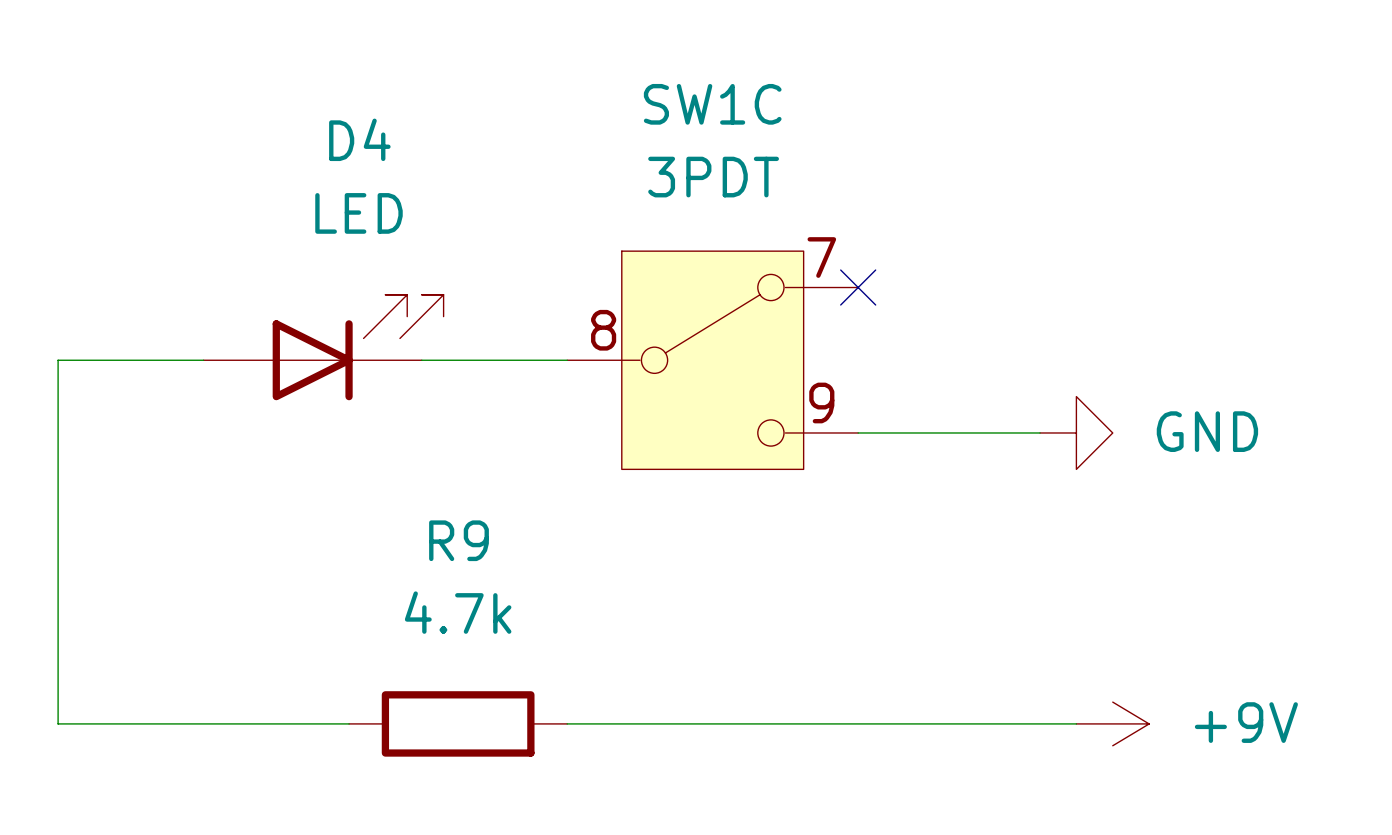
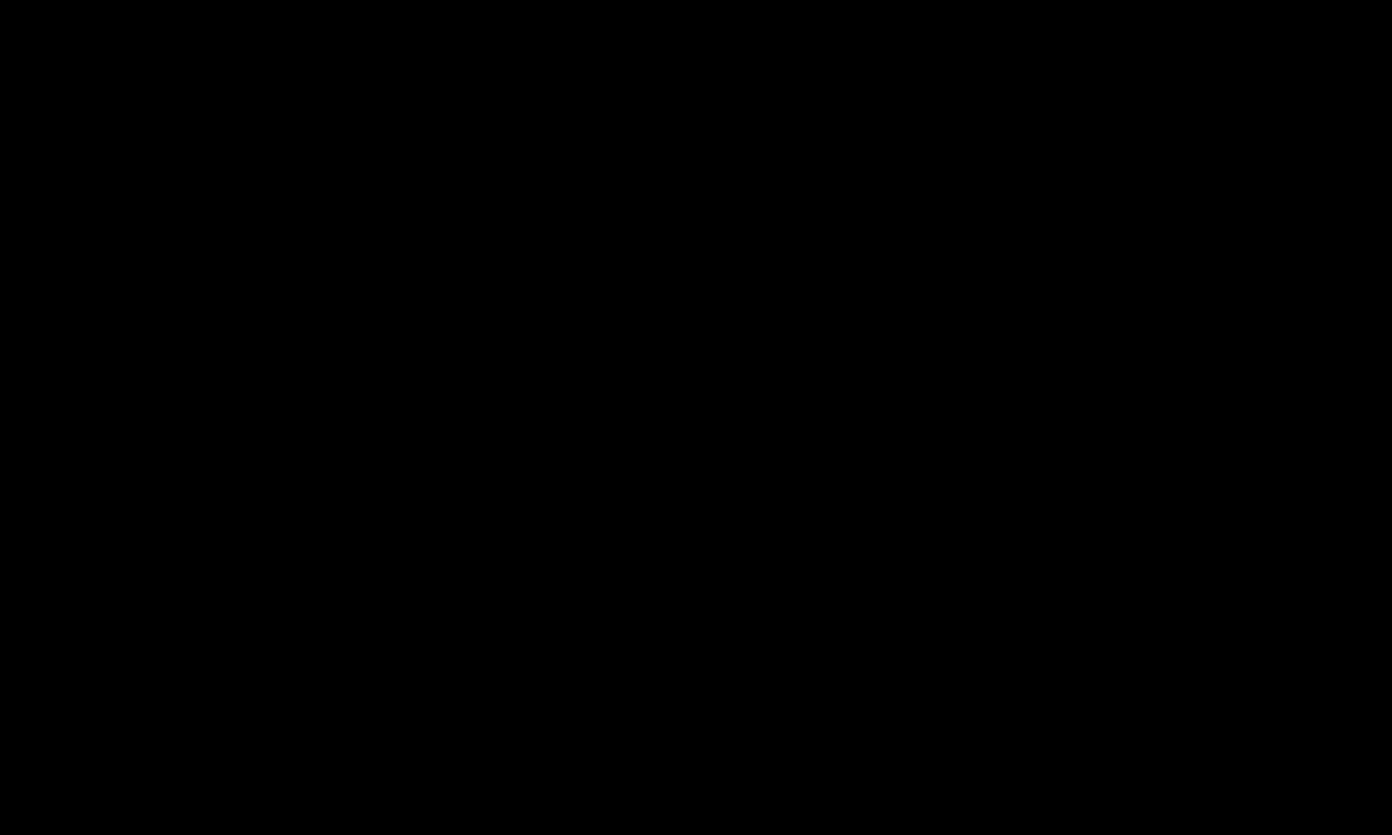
no-connect mark: (858, 287) -> none
D4: LED (323, 347) -> none
wire: (203, 360) (58, 360) (58, 723) (349, 723) -> none
wire: (421, 360) (567, 360) -> none
SW1C: 3PDT (712, 360) -> none
wire: (858, 432) (1040, 432) -> none
power symbol: GND (1076, 432) -> none
R9: 4.7k (458, 723) -> none
wire: (567, 723) (1076, 723) -> none
power symbol: +9V (1112, 723) -> none

